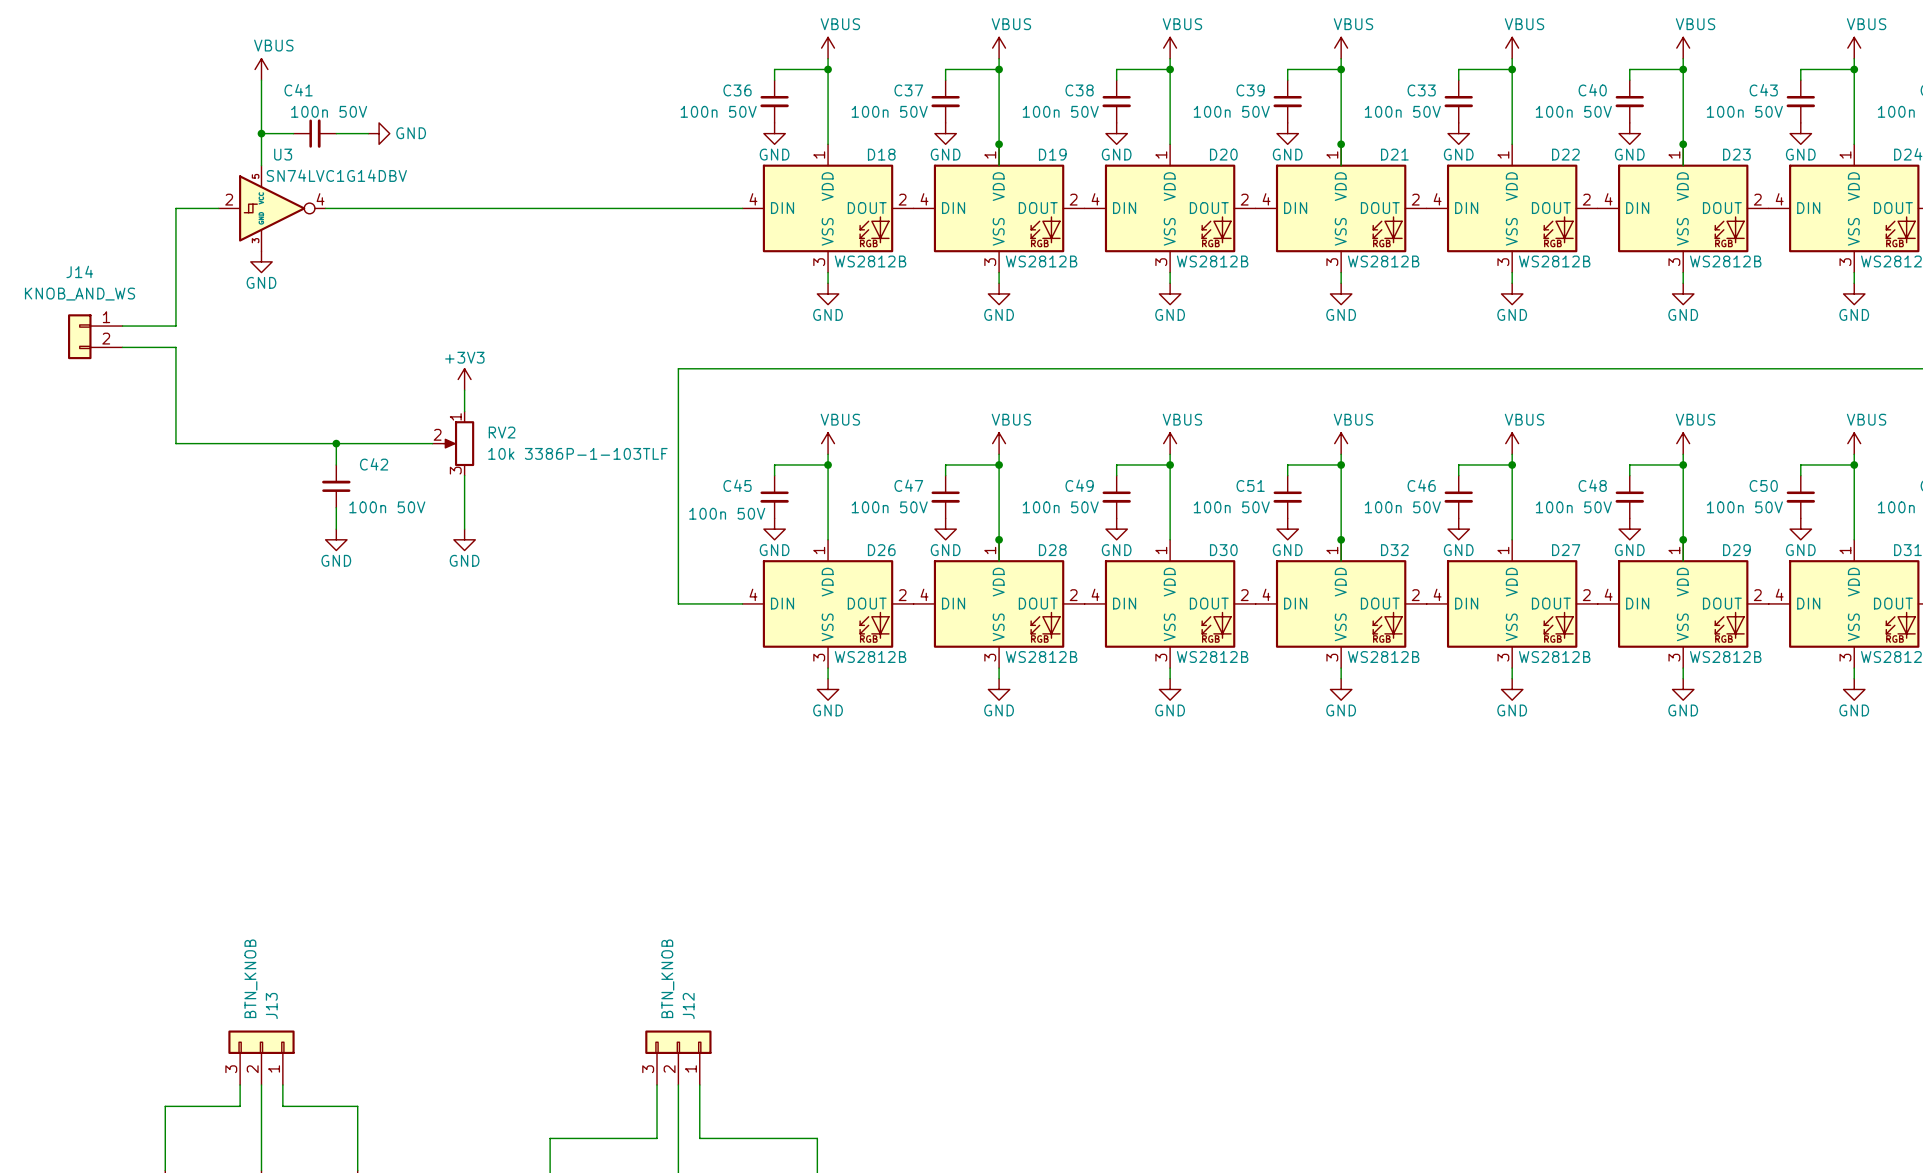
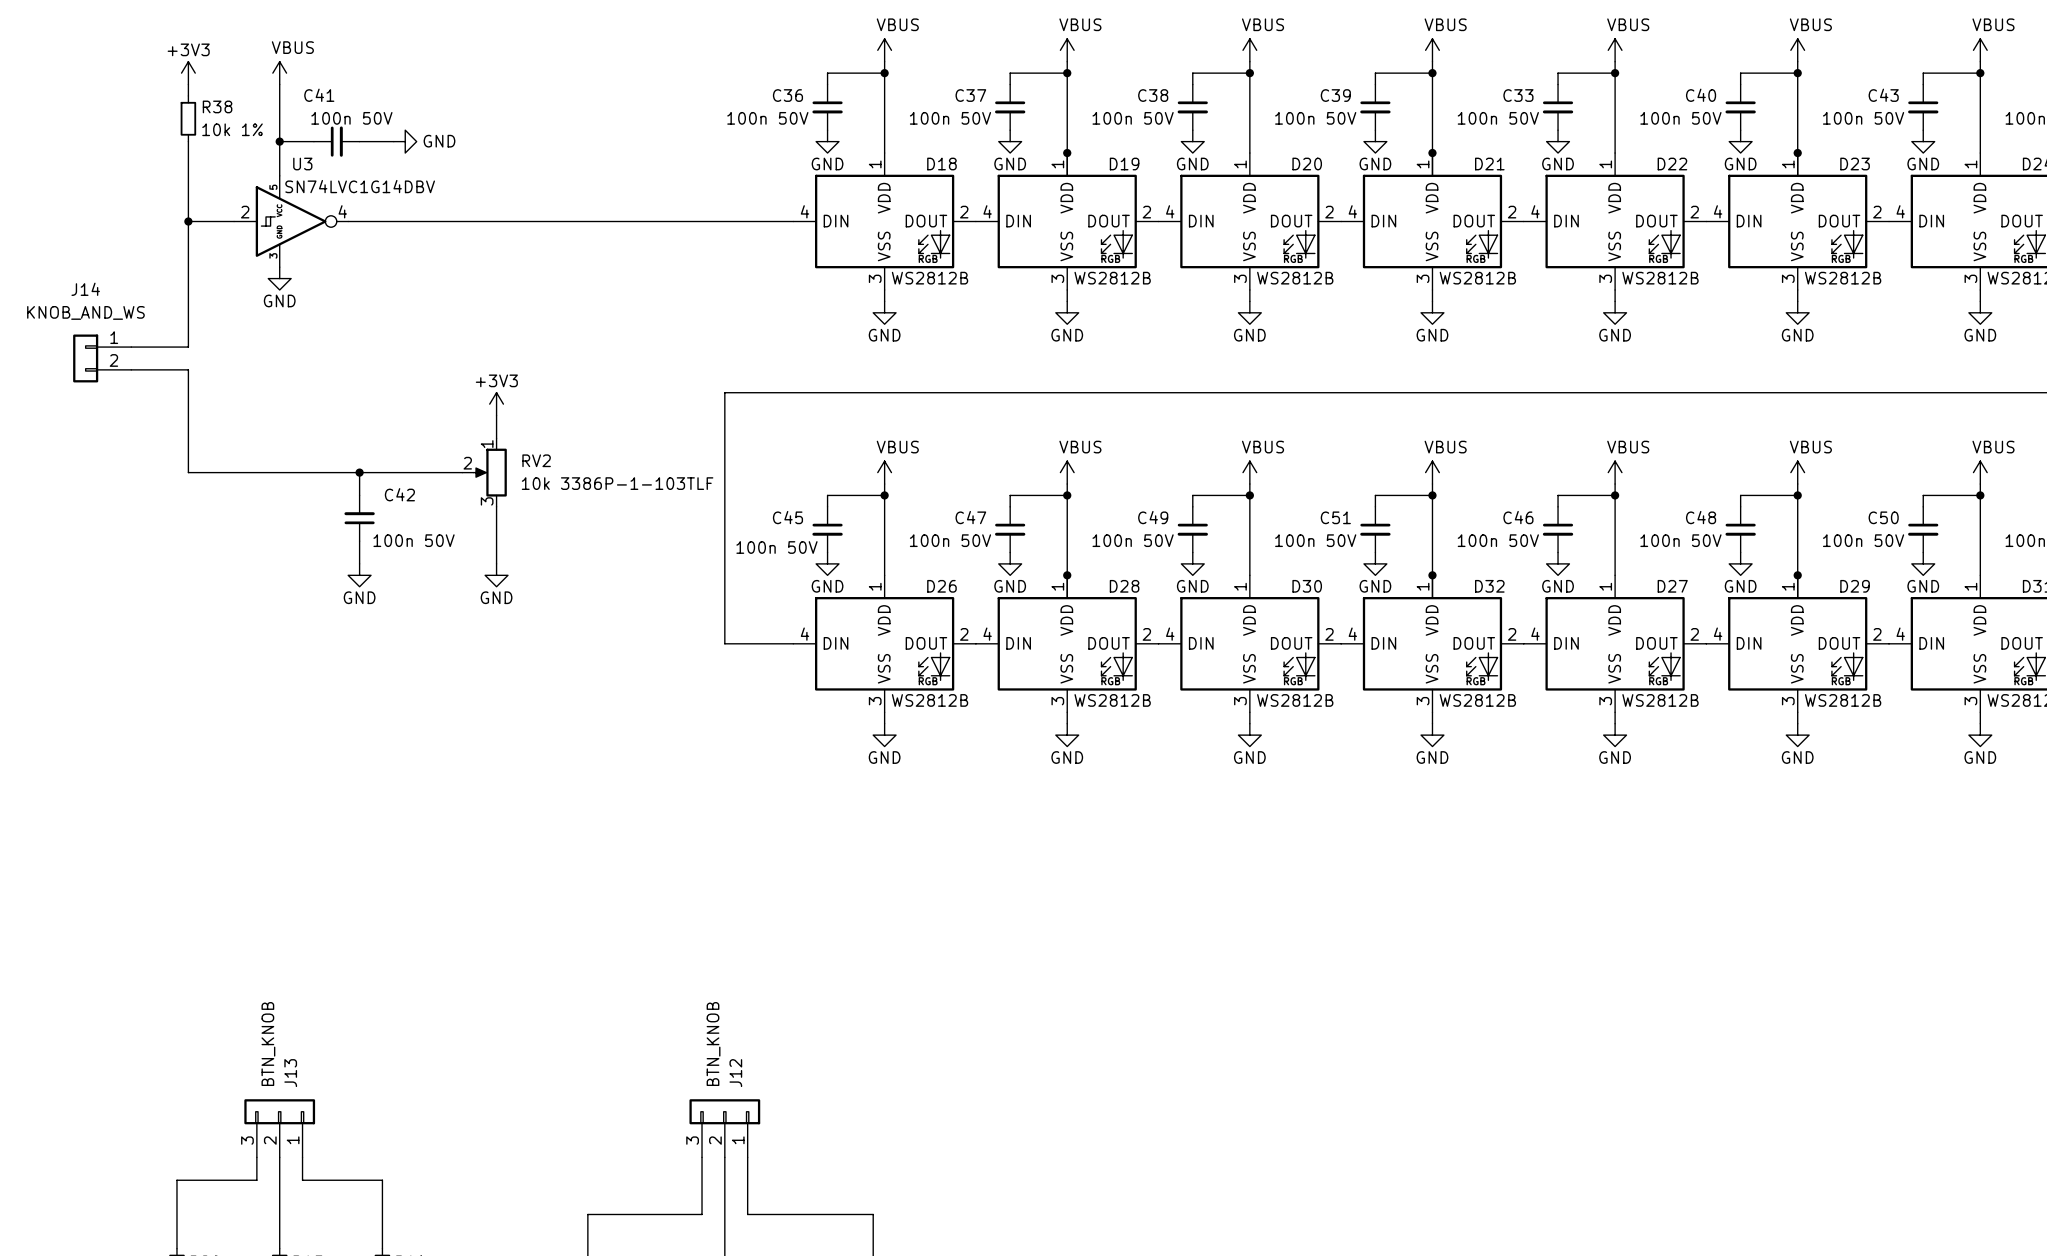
power symbol: none -> +3V3 (188, 73)
wire: none -> (188, 84) (188, 95)
R38: none -> 10k 1% (188, 118)
wire: none -> (188, 141) (188, 221)
junction: none -> (188, 221)

